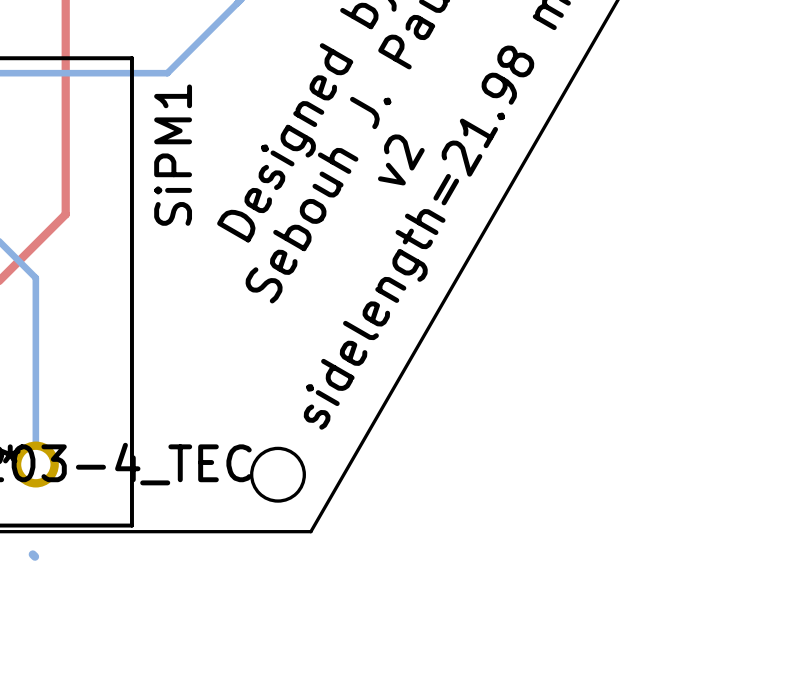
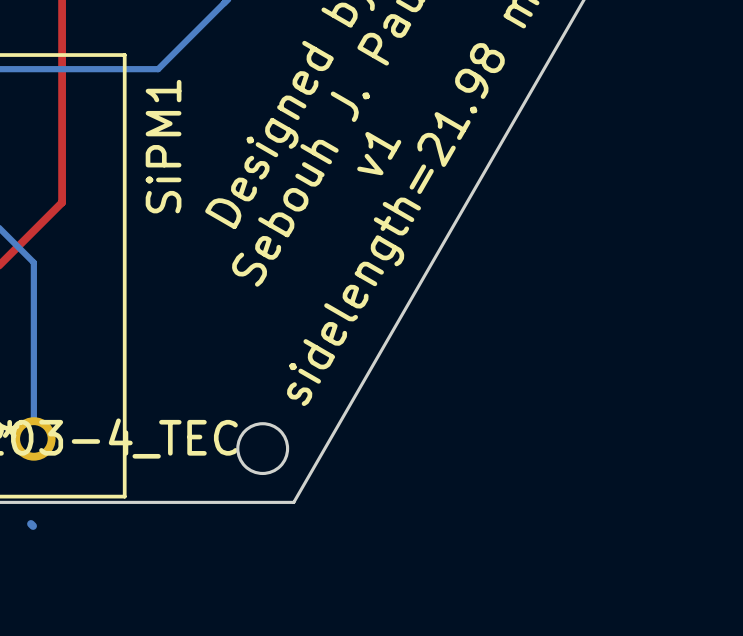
text: v2 (401, 159) -> v1 (379, 153)

